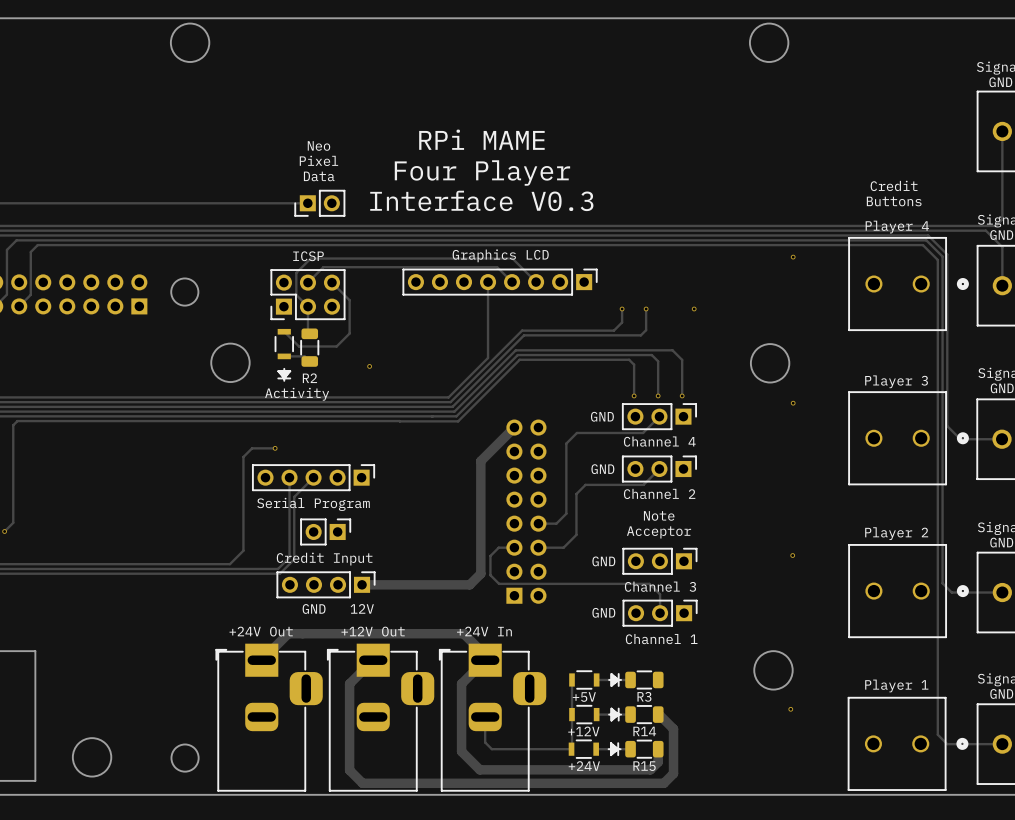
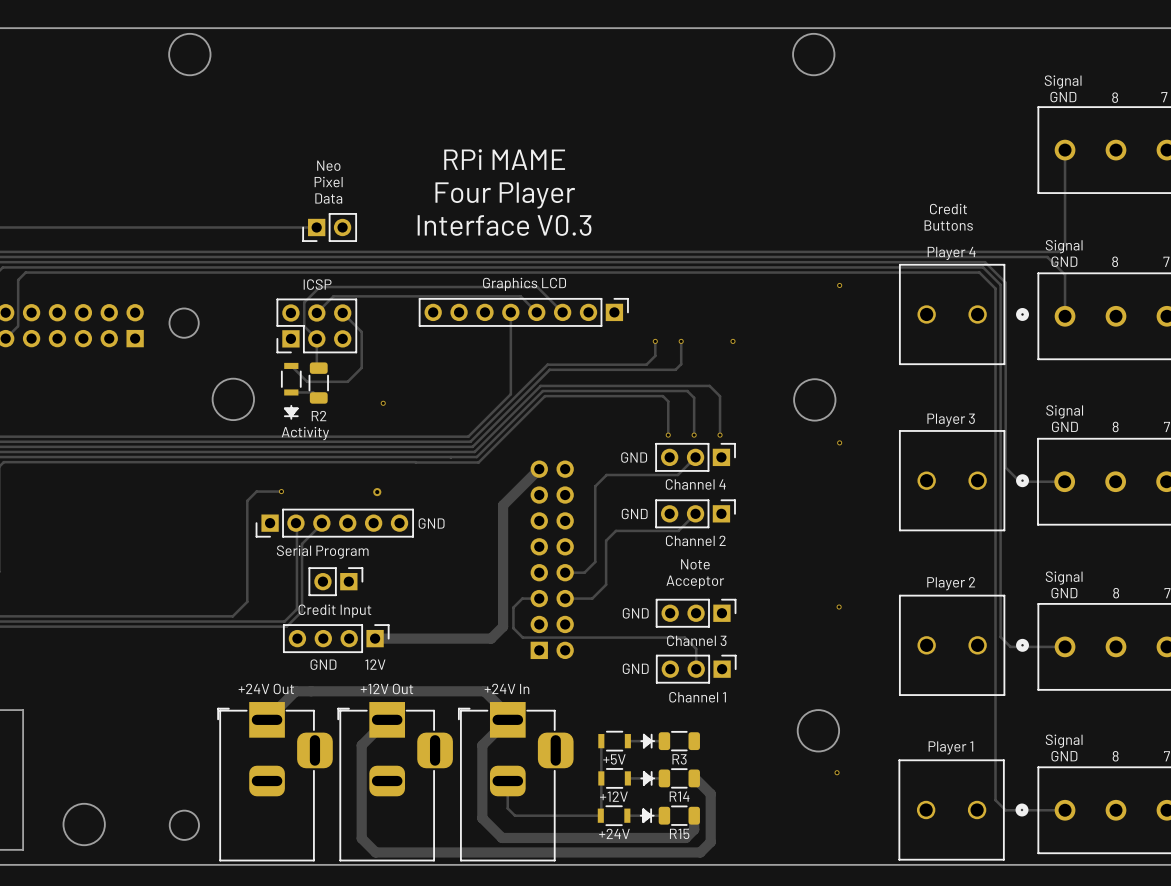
via: none -> (377, 492)
part: (313, 477) -> none
part: none -> (334, 523)
text: none -> GND (431, 523)

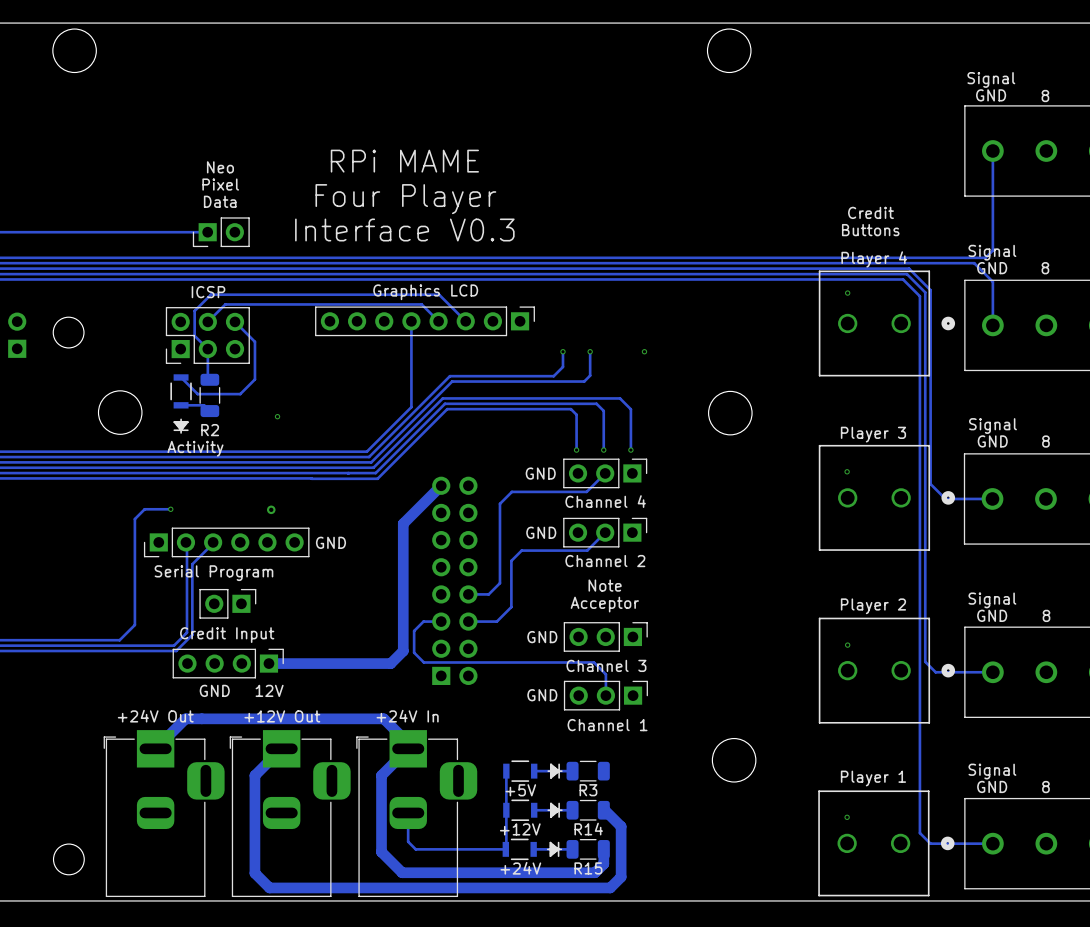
via: (839, 285) -> none
via: none -> (847, 293)
via: (839, 442) -> none
via: none -> (847, 471)
via: (839, 607) -> none
via: none -> (847, 645)
via: (837, 772) -> none
via: none -> (847, 817)

